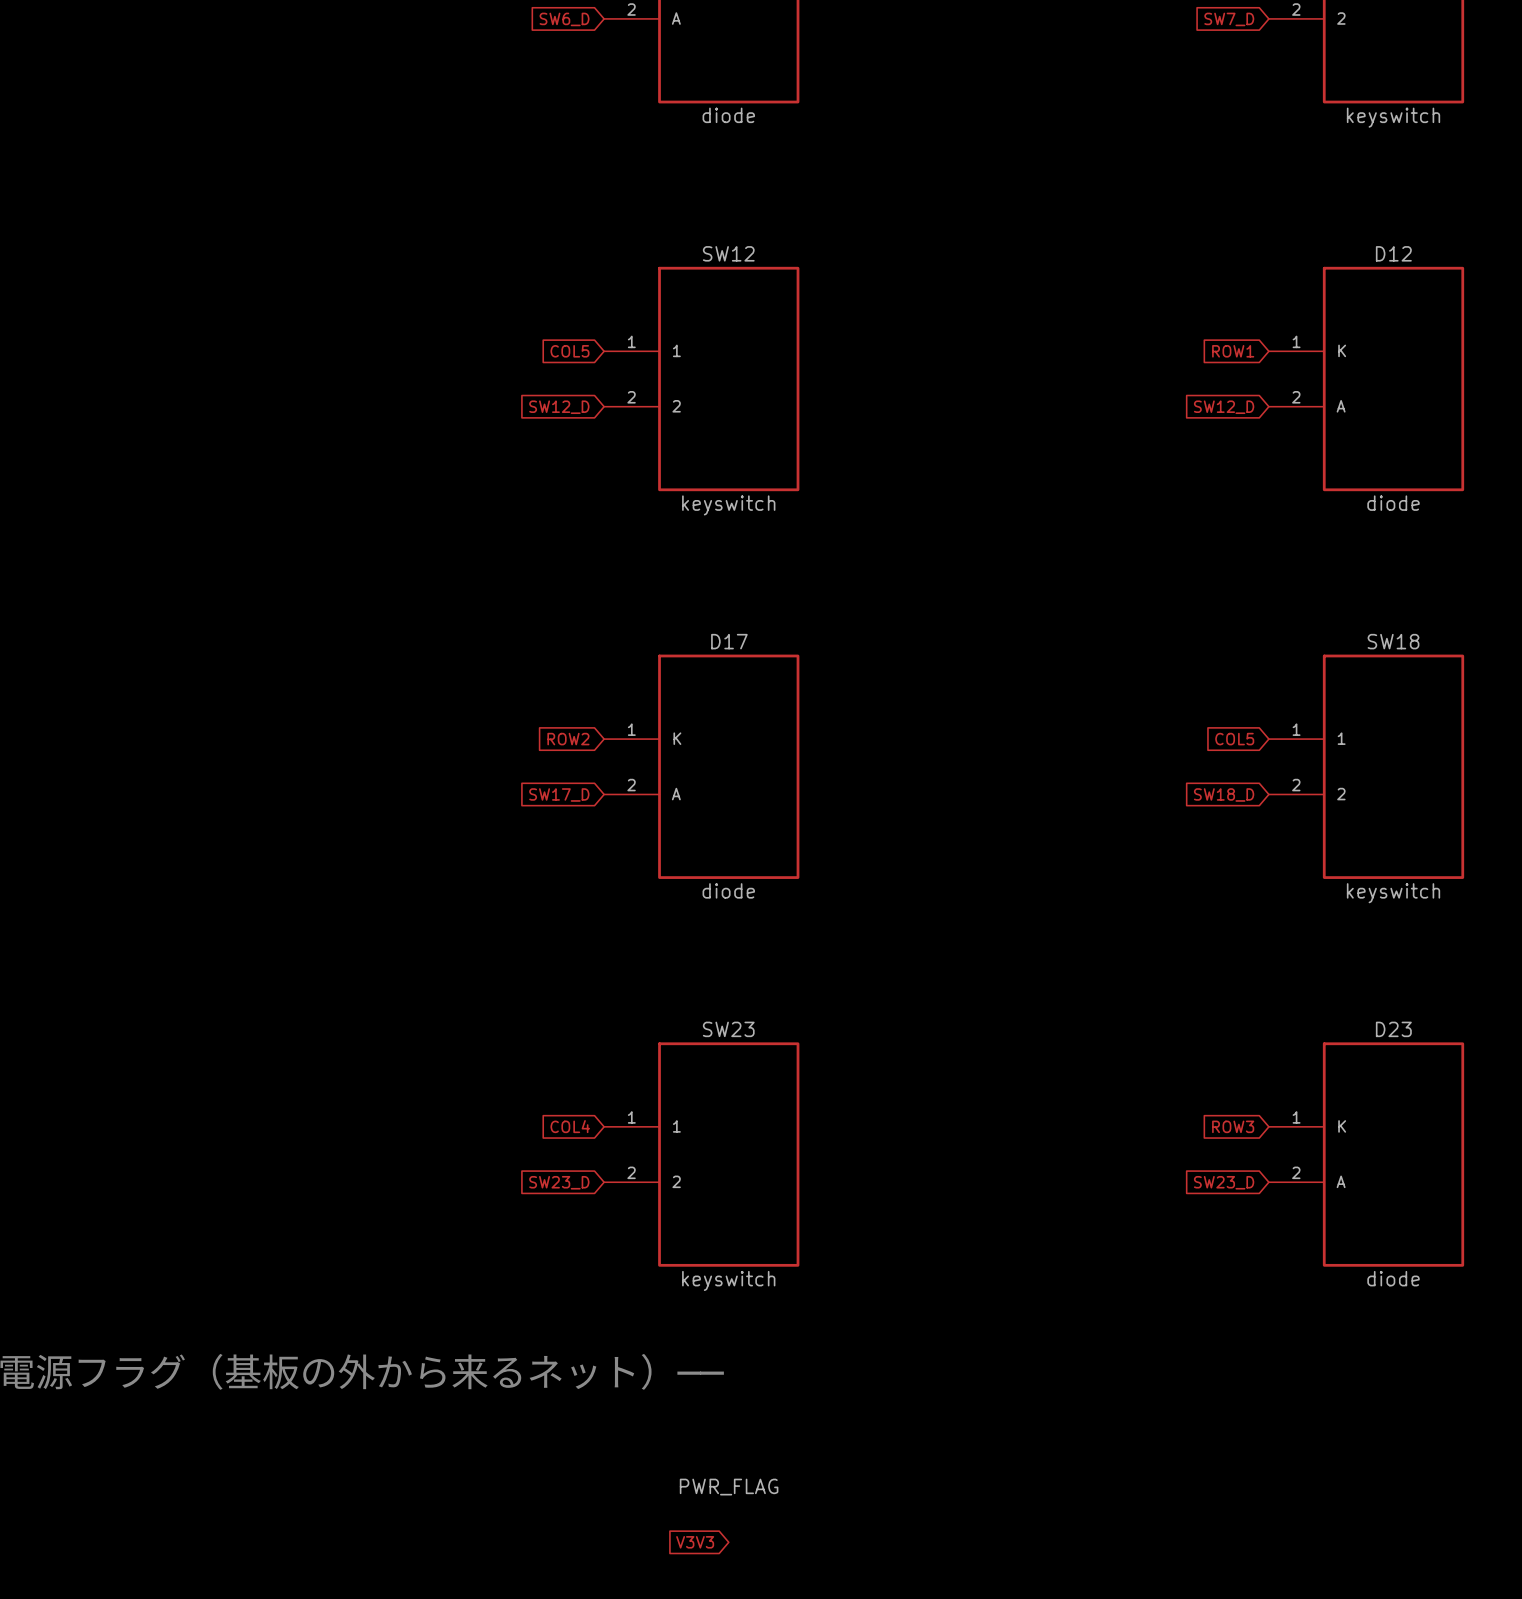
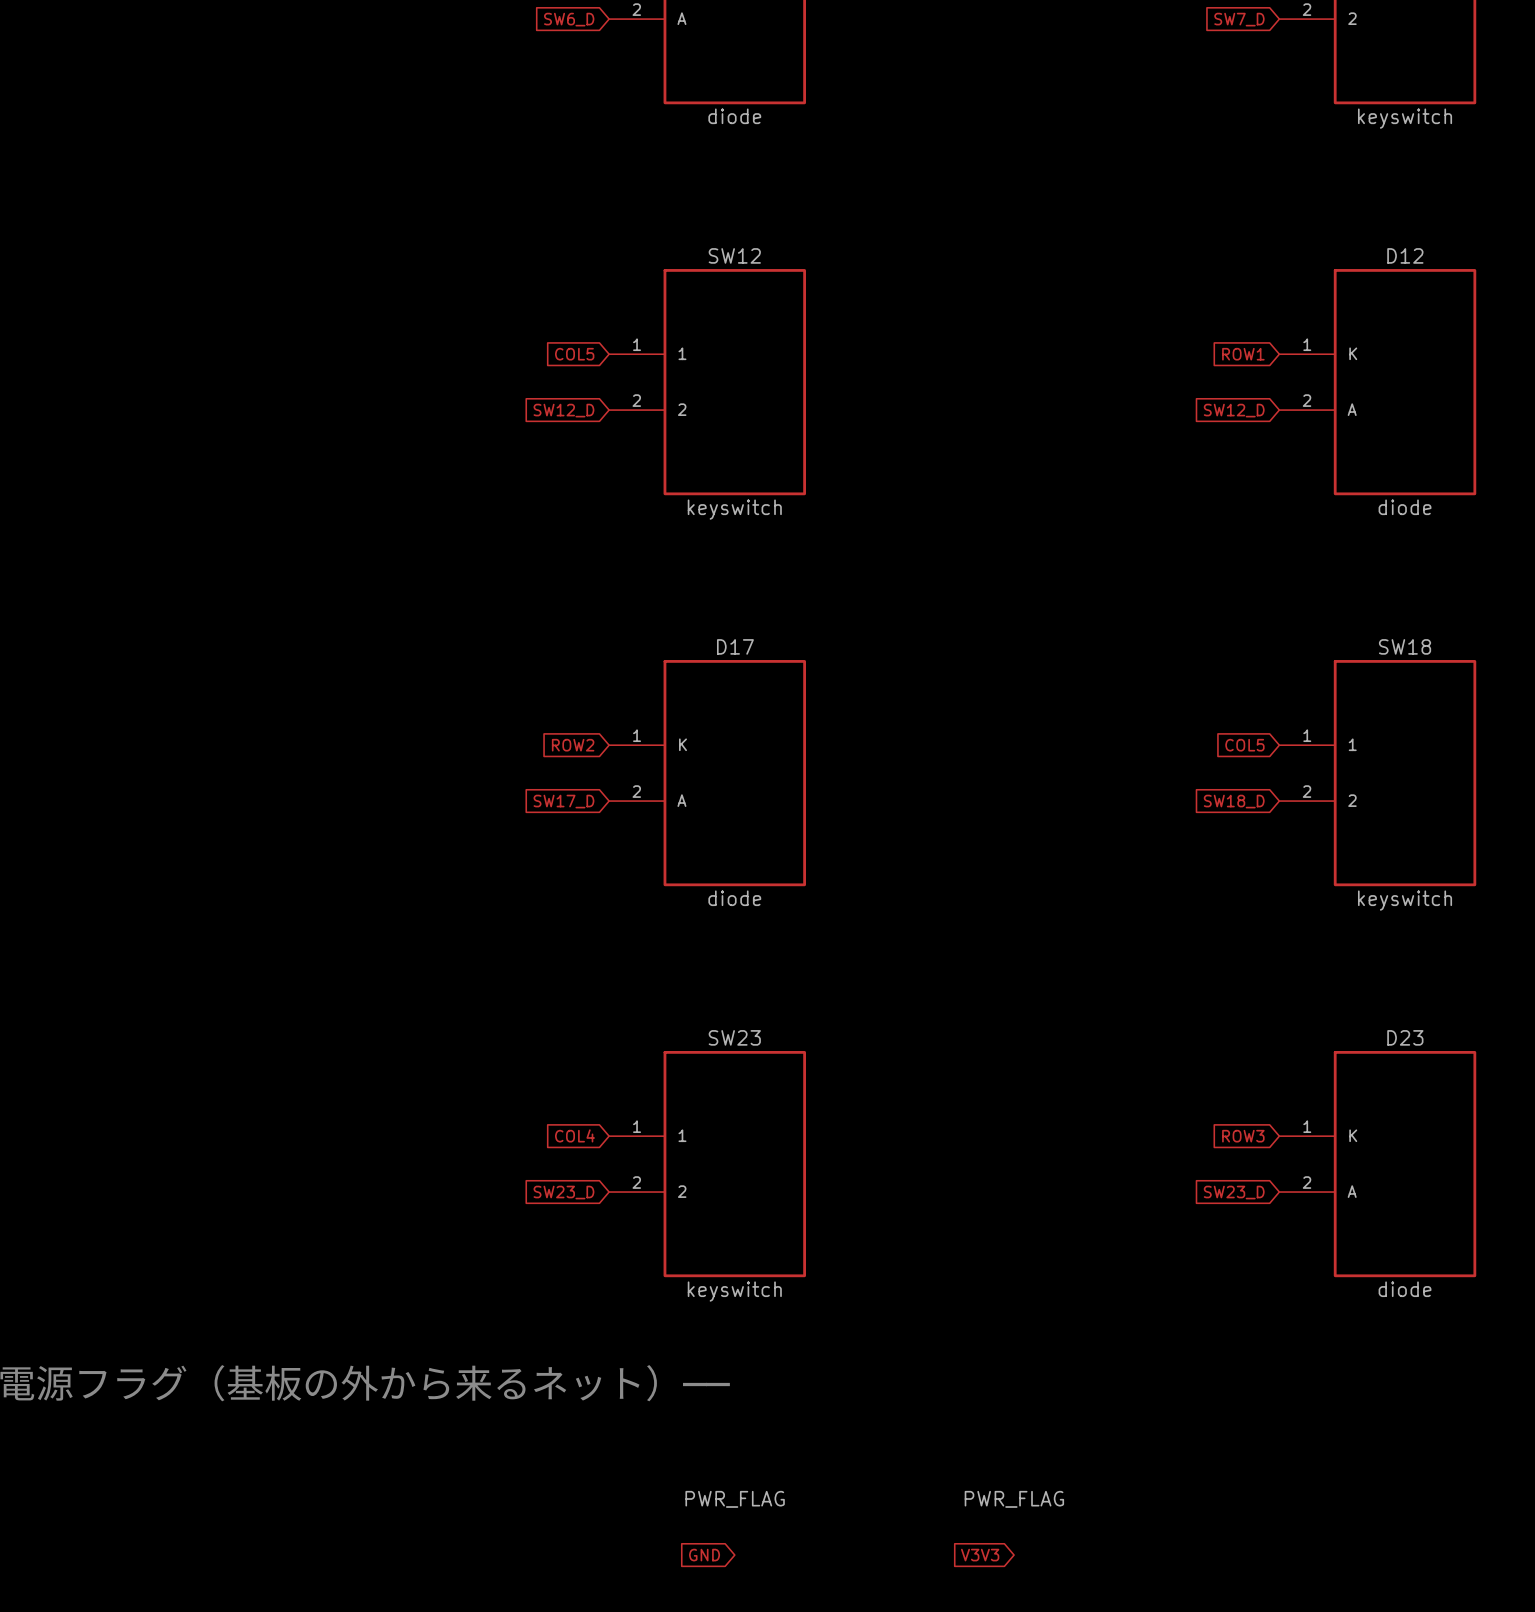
power symbol: none -> PWR_FLAG (1014, 1499)
global label: V3V3 (695, 1542) -> GND (704, 1555)
global label: none -> V3V3 (980, 1555)

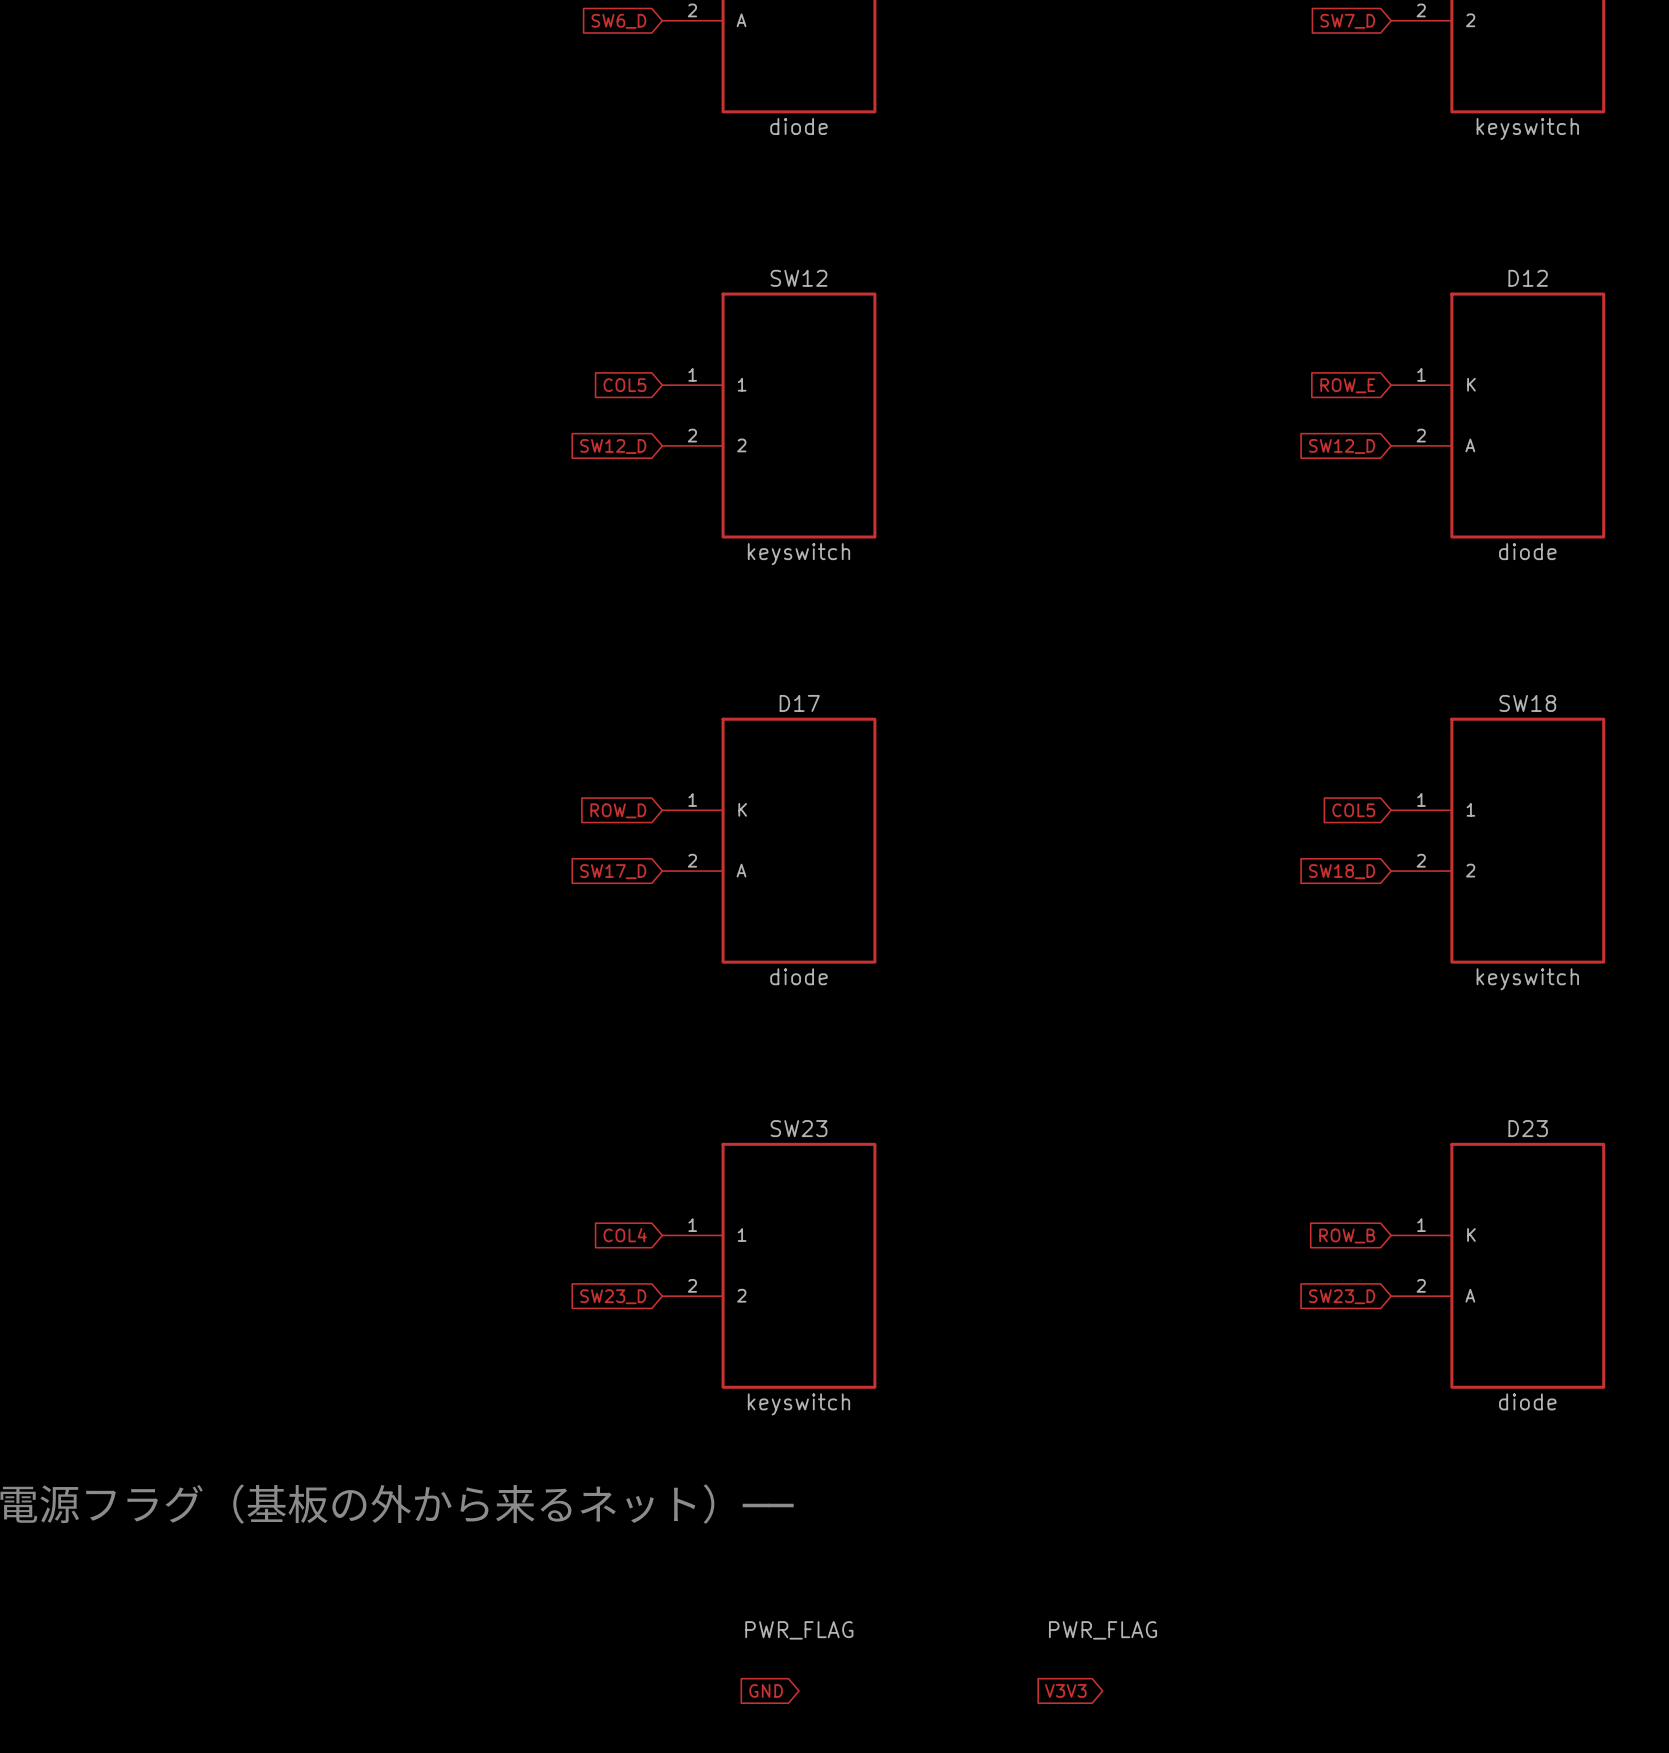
global label: ROW1 (1243, 354) -> ROW_E (1347, 385)
global label: ROW2 (573, 745) -> ROW_D (618, 810)
global label: ROW3 (1243, 1136) -> ROW_B (1347, 1236)

